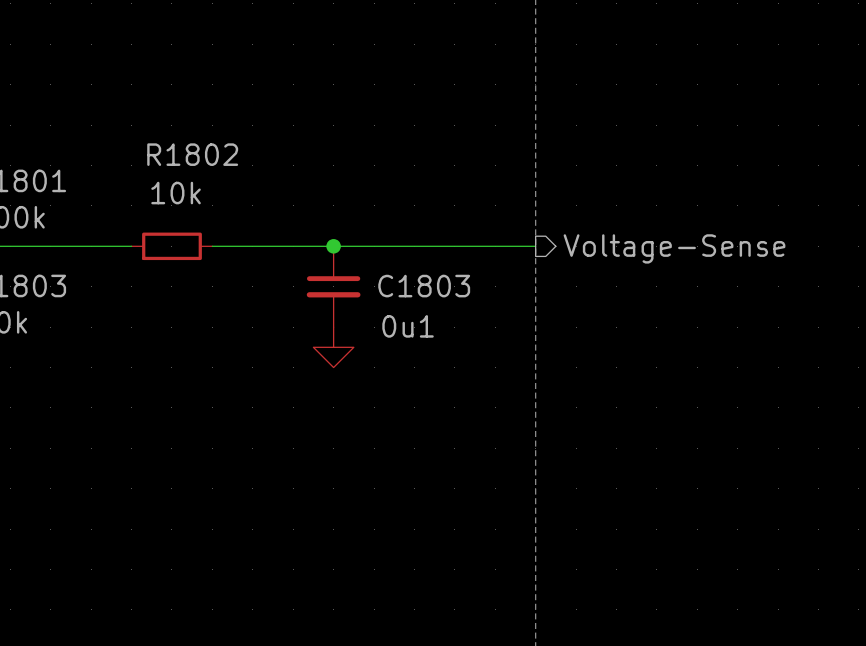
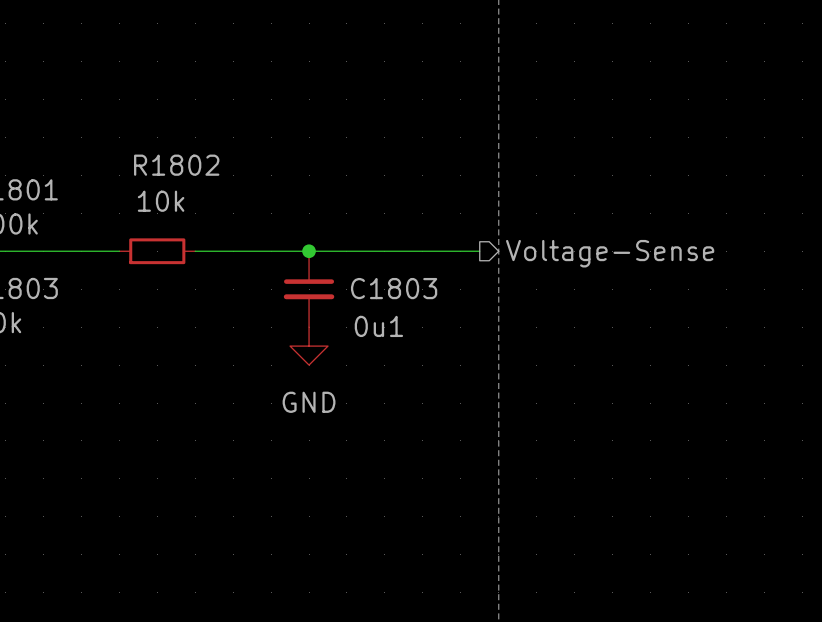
wire: (515, 246) (535, 246) -> none
hierarchical label position: Voltage-Sense (674, 248) -> Voltage-Sense (610, 253)
power symbol text: none -> GND (309, 402)

